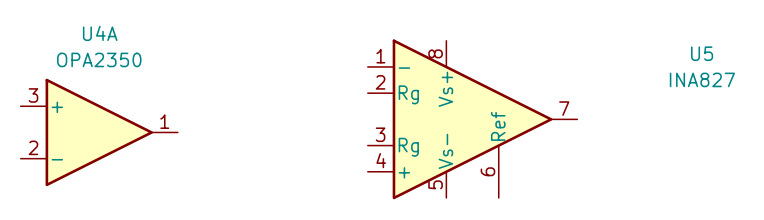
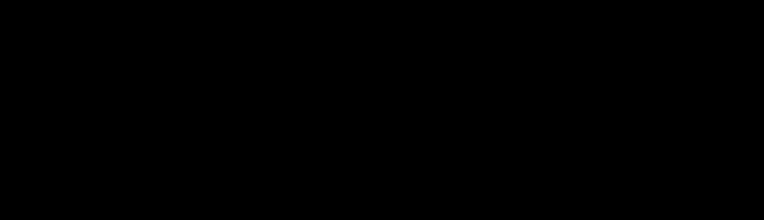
U5: INA827 (472, 119) -> none
U4A: OPA2350 (99, 132) -> none

